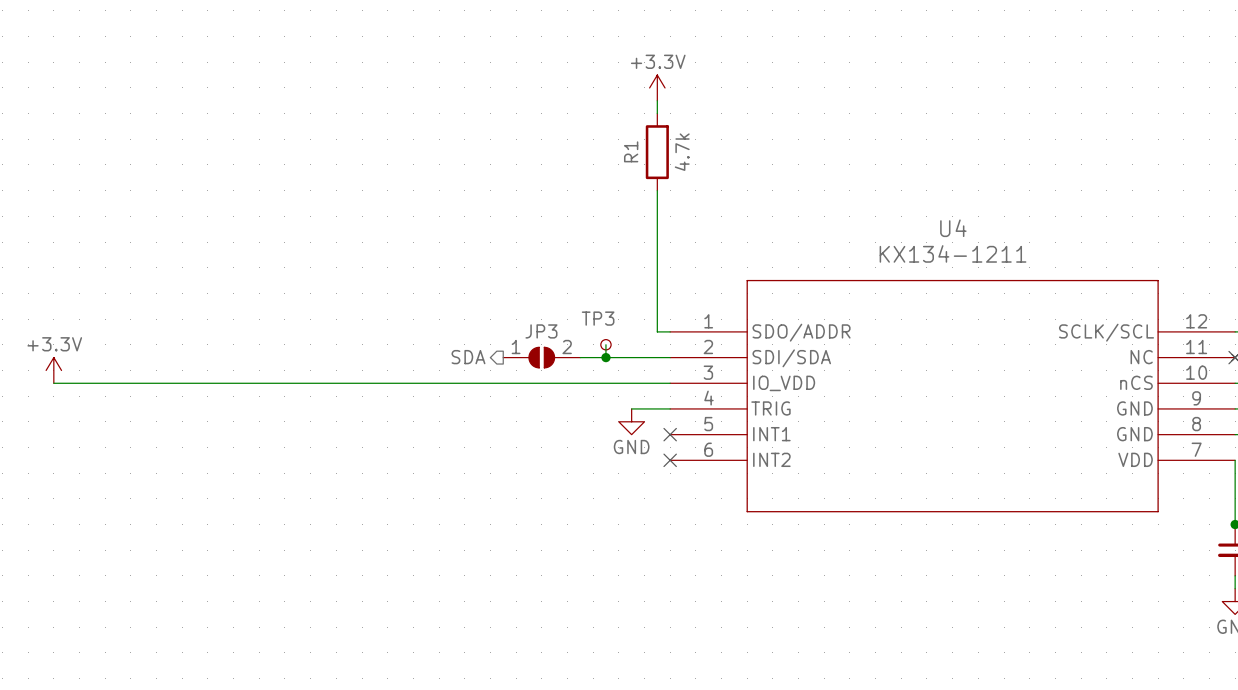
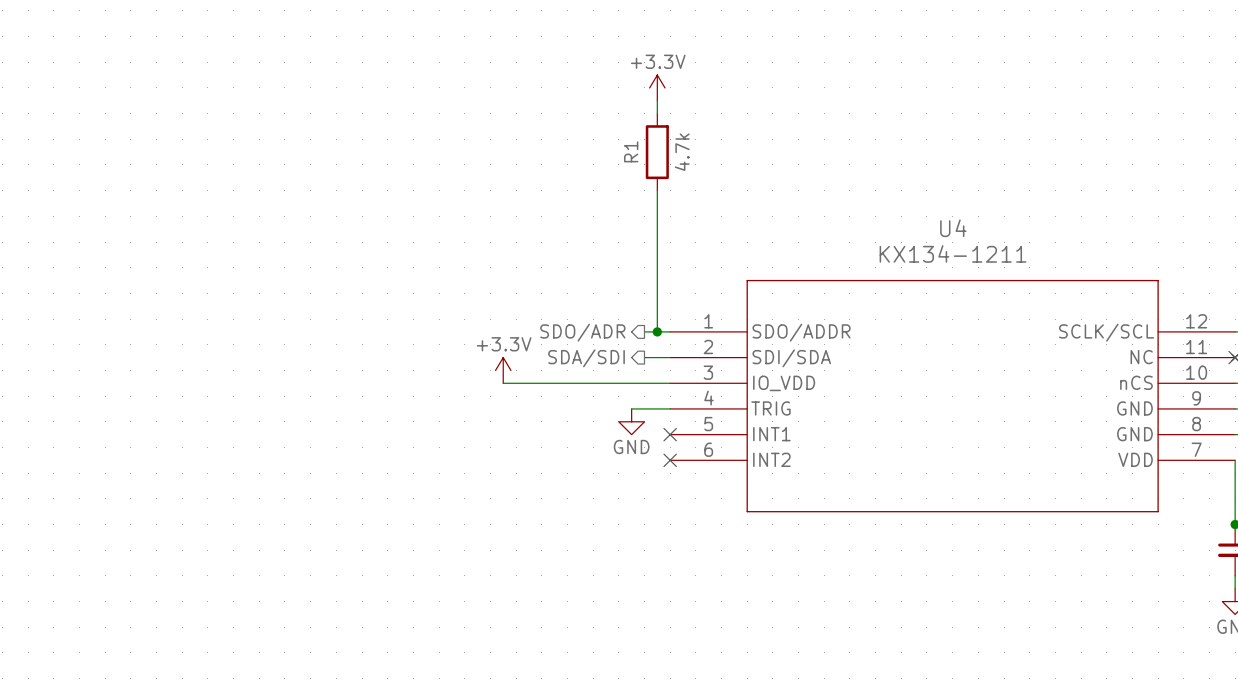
wire: none -> (644, 331) (657, 331)
hierarchical label: none -> SDO/ADR (582, 332)
wire: (605, 344) (605, 357) -> none
TP3: (605, 344) -> none
hierarchical label: SDA (468, 357) -> none
JP3: (541, 357) -> none
wire: (580, 357) (644, 357) -> none
junction position: (605, 357) -> (657, 331)
hierarchical label: none -> SDA/SDI (586, 358)
power symbol: +3.3V (53, 370) -> none
power symbol: none -> +3.3V (503, 370)
wire: (53, 383) (503, 383) -> none

